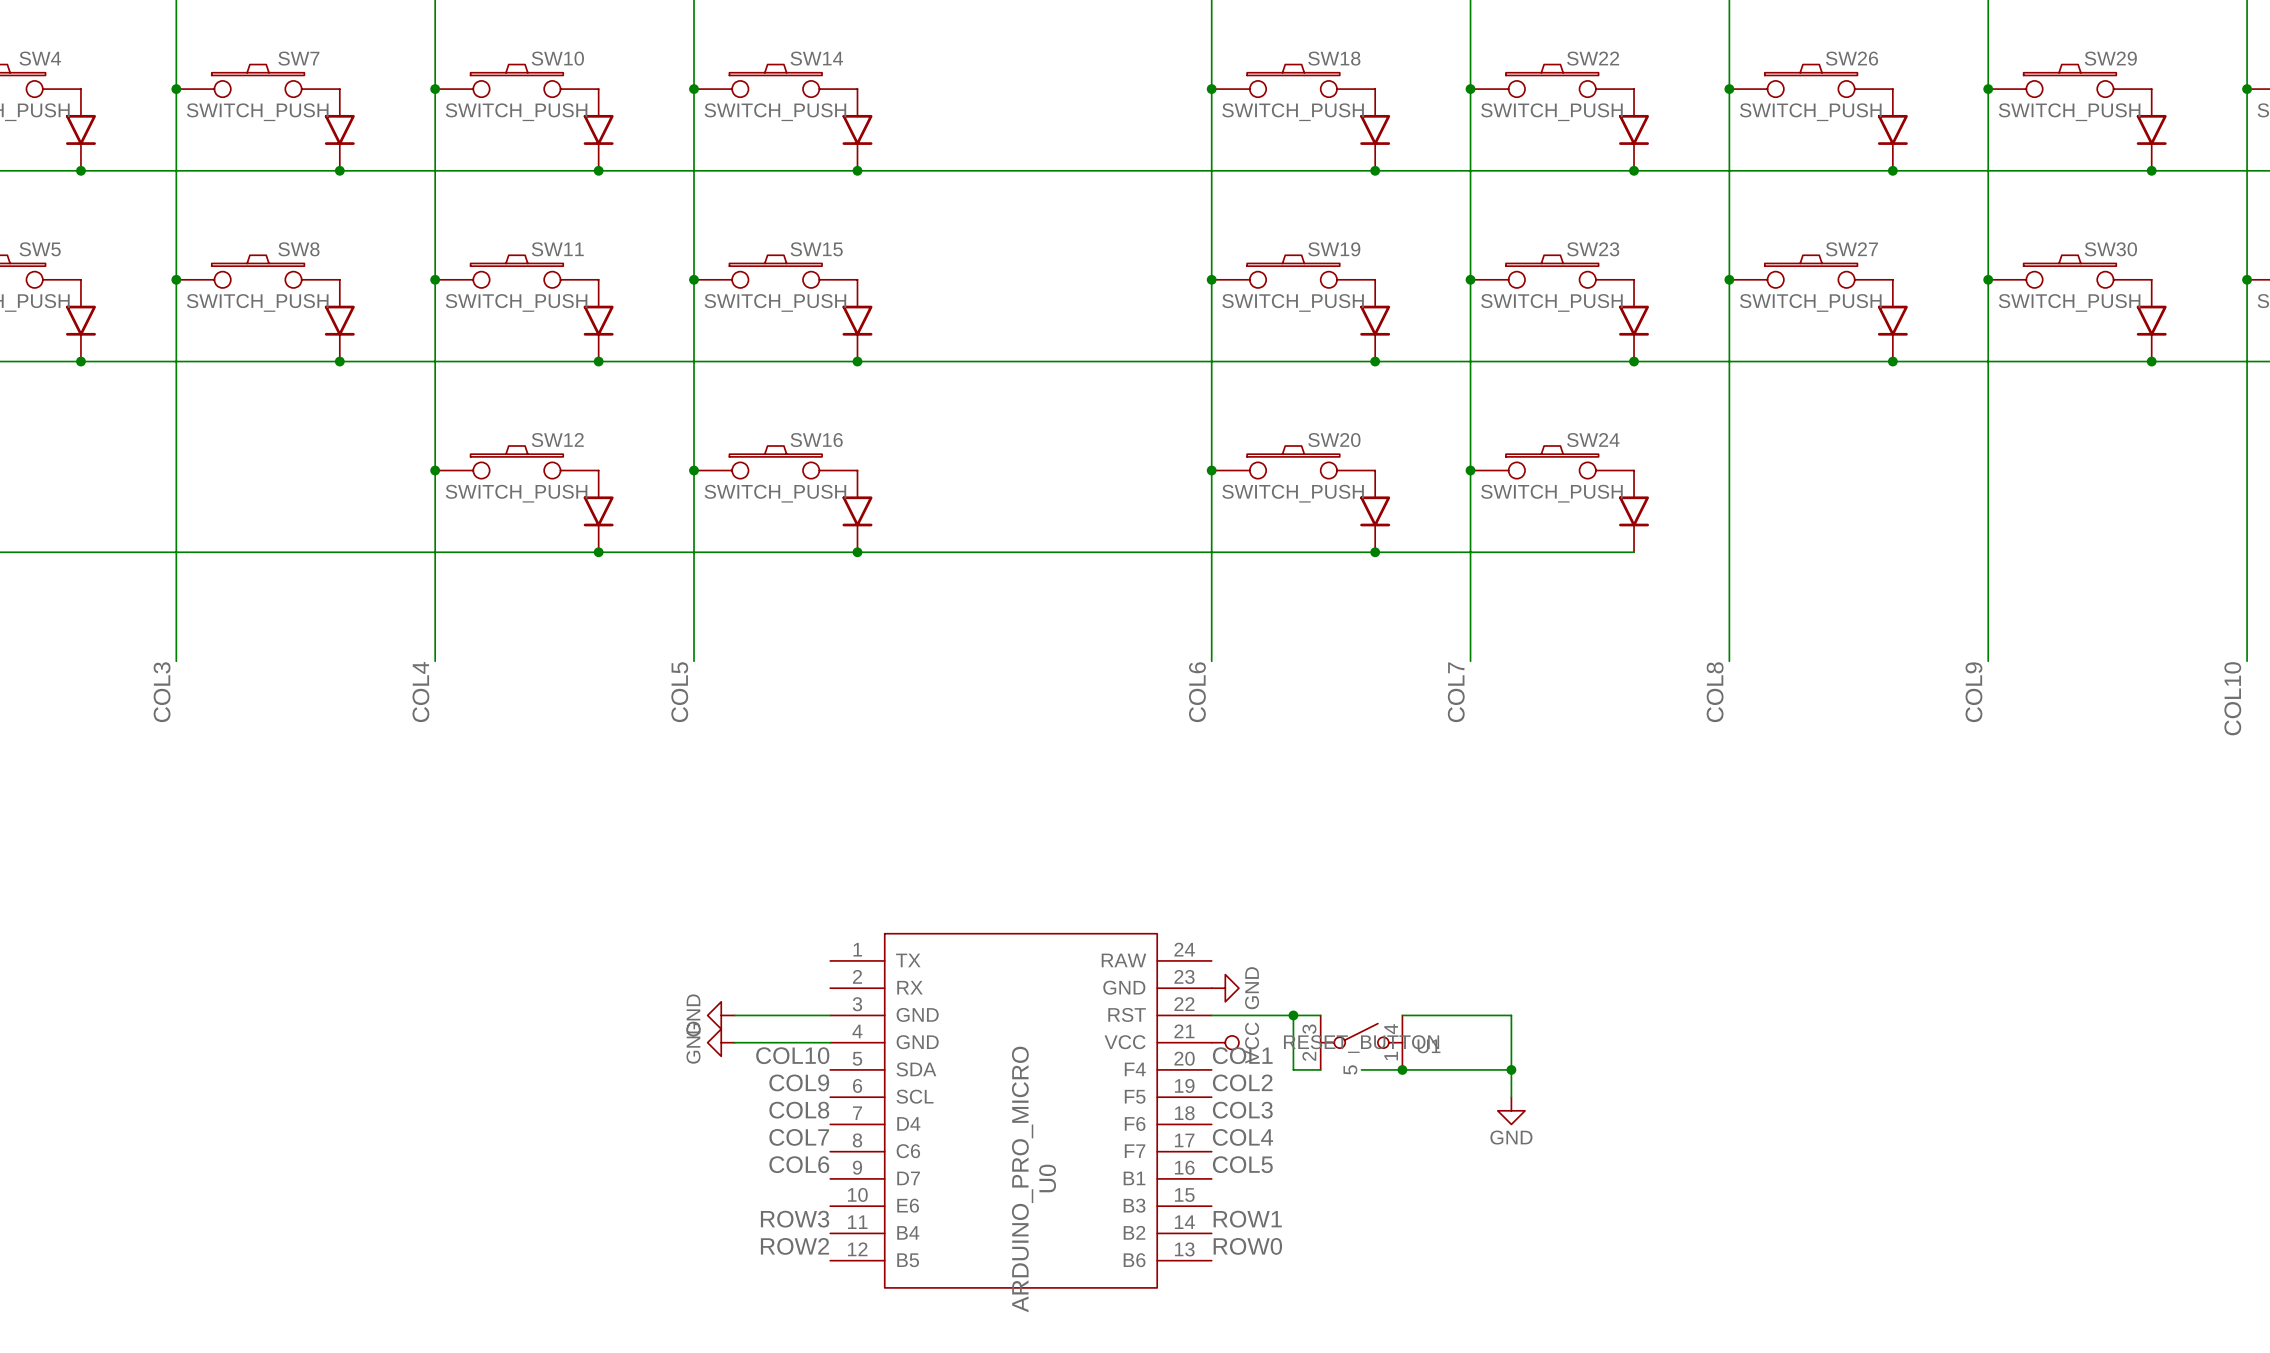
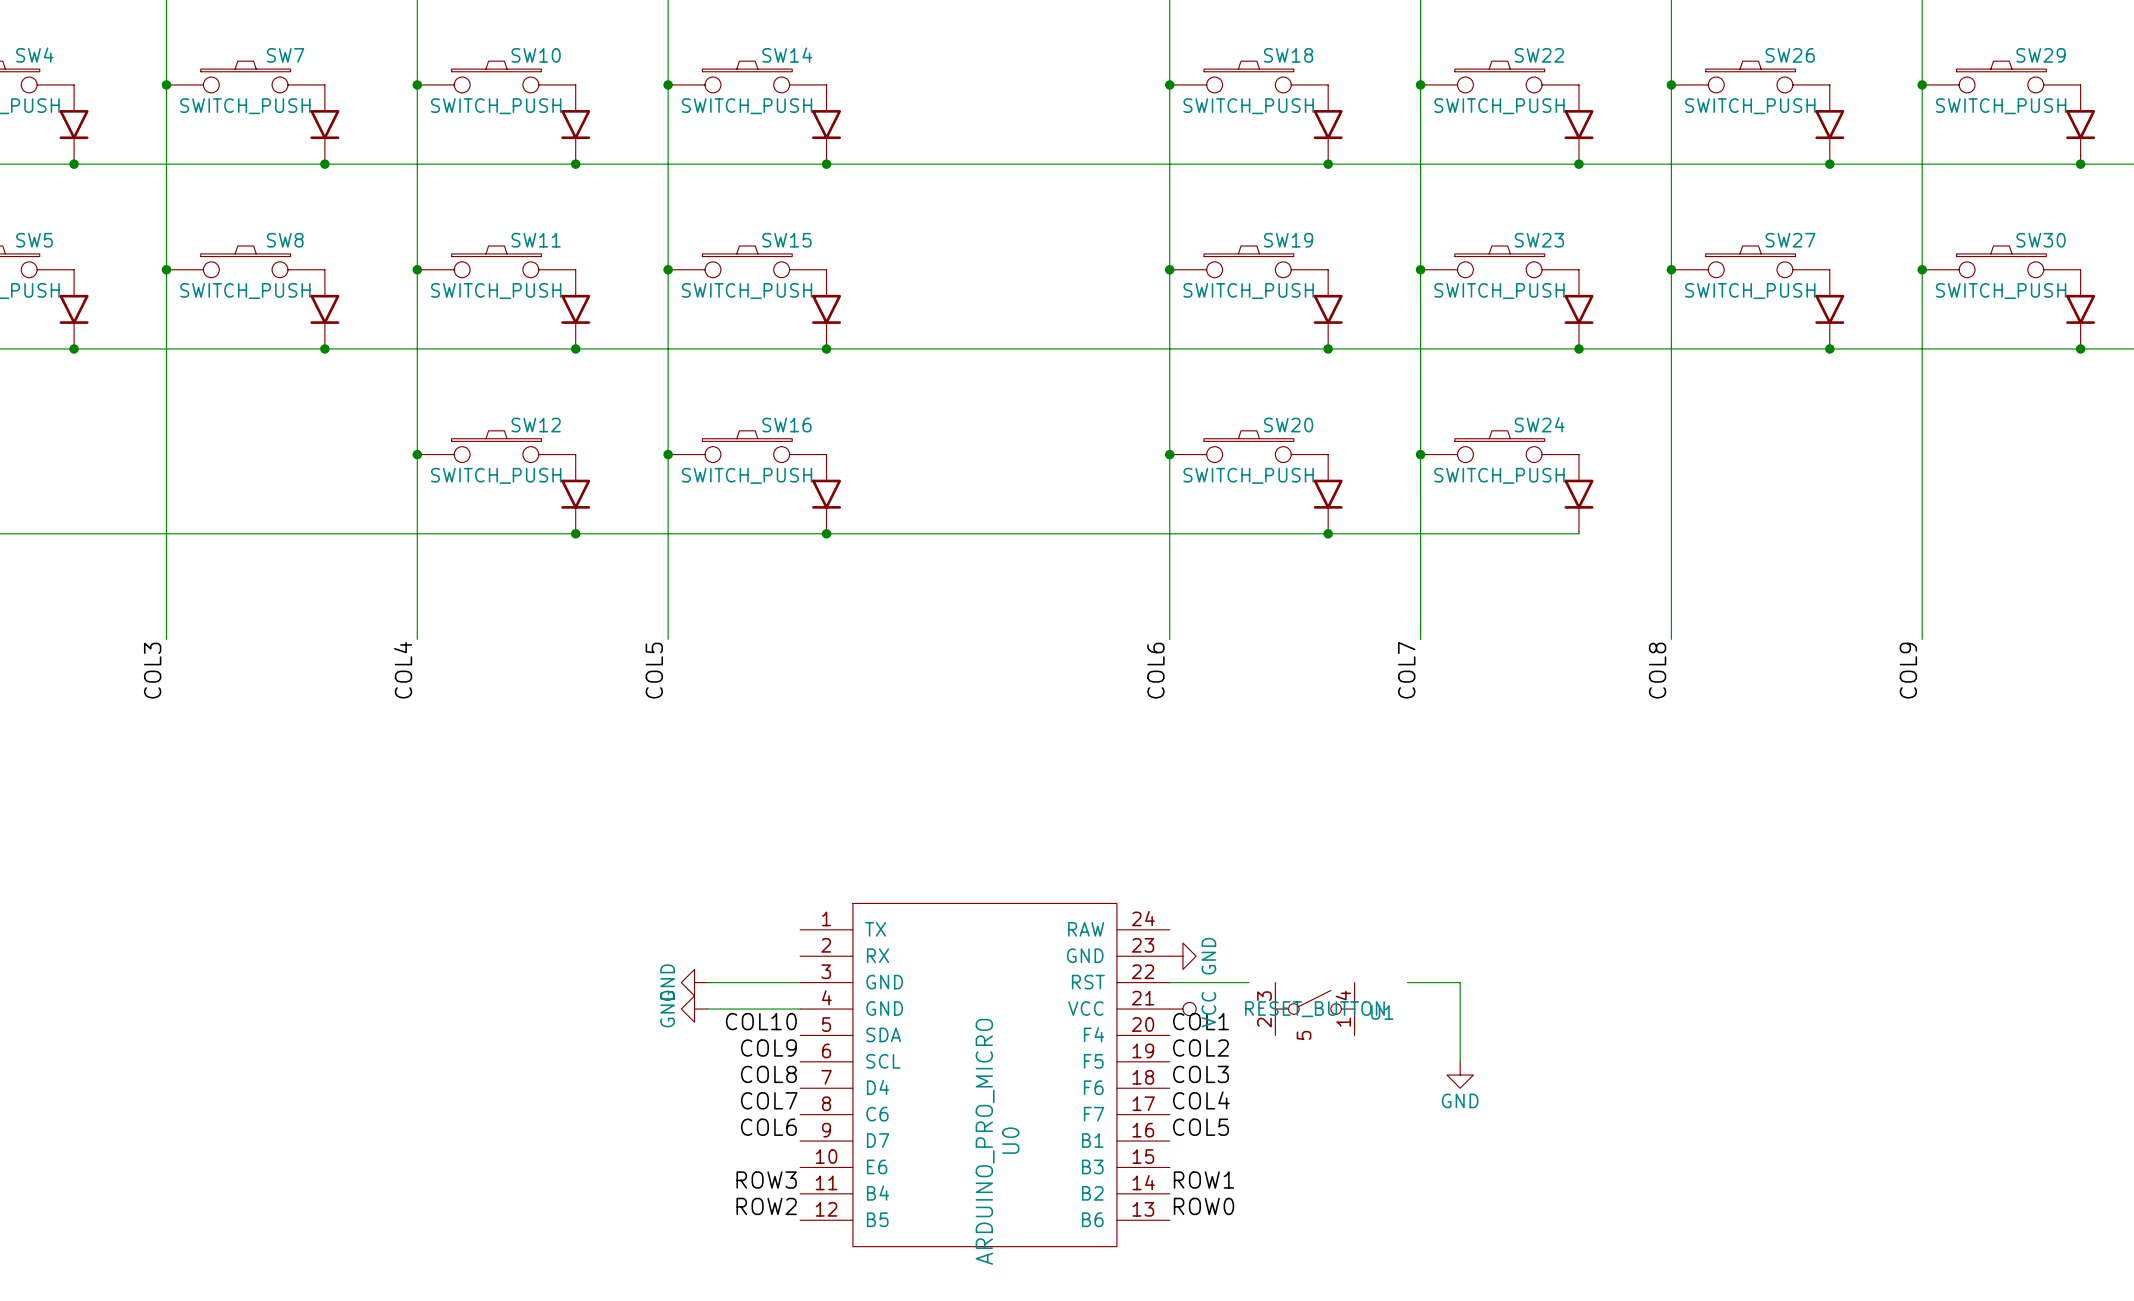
junction: (1293, 1015) -> none
wire: (1320, 1015) (1293, 1015) (1293, 1069) (1320, 1069) -> none
wire: (1402, 1015) (1456, 1015) -> none
wire: (1361, 1069) (1511, 1069) -> none
junction: (1402, 1069) -> none
junction: (1511, 1069) -> none

